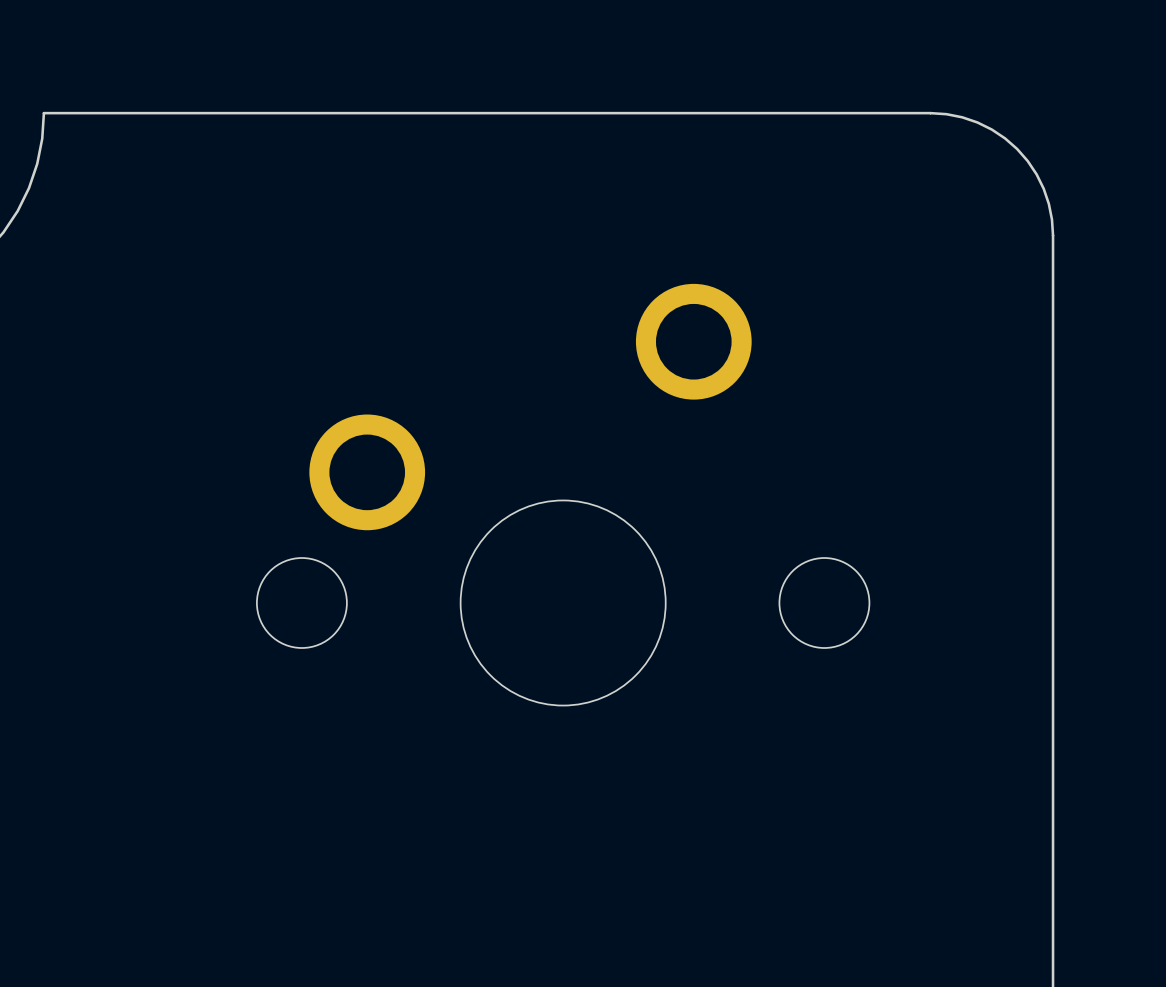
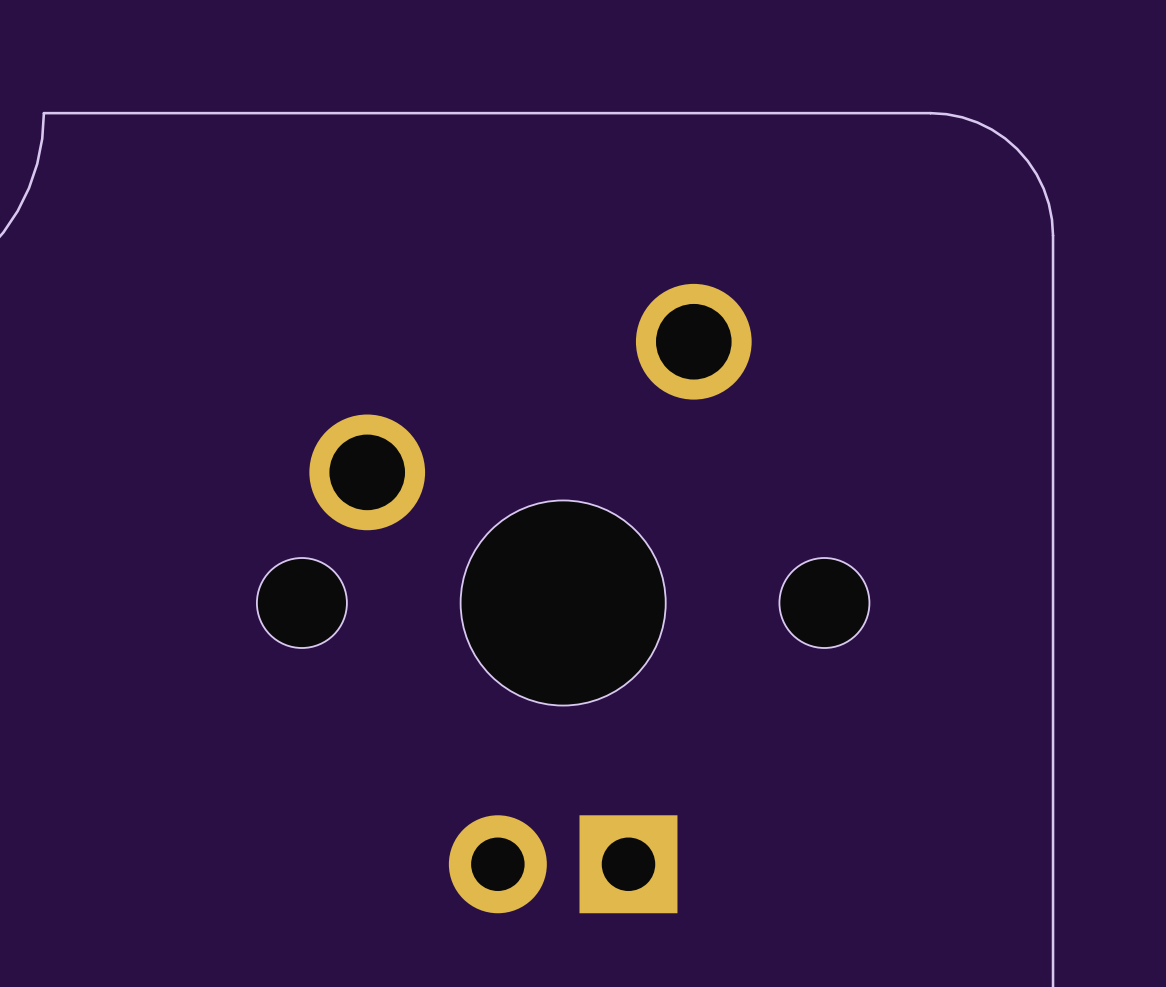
part: none -> (563, 598)

